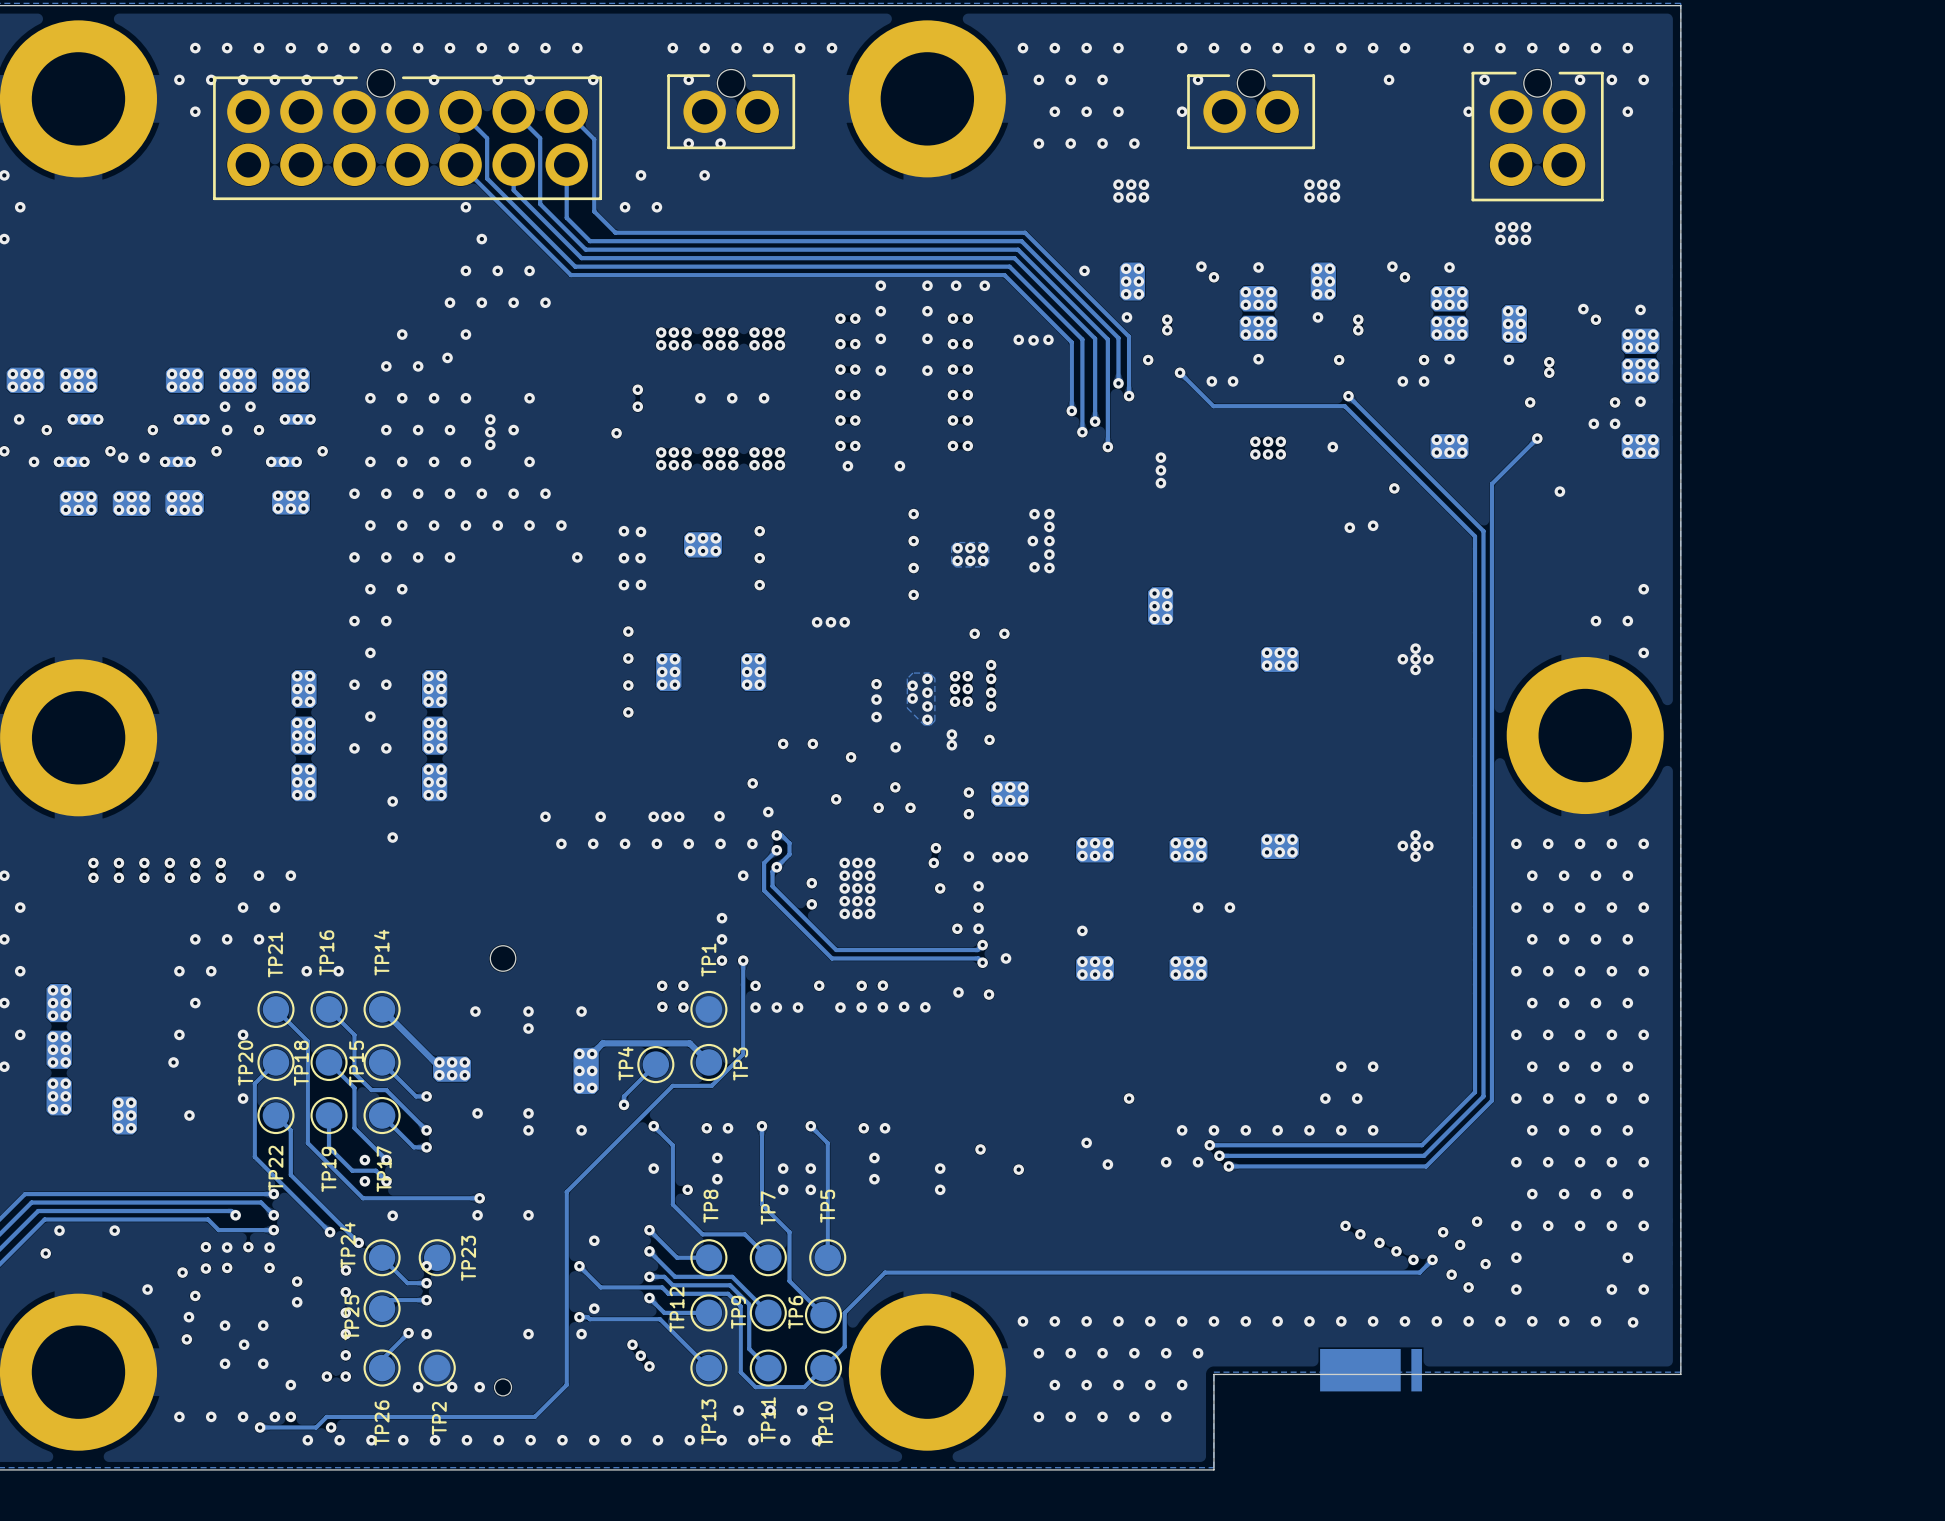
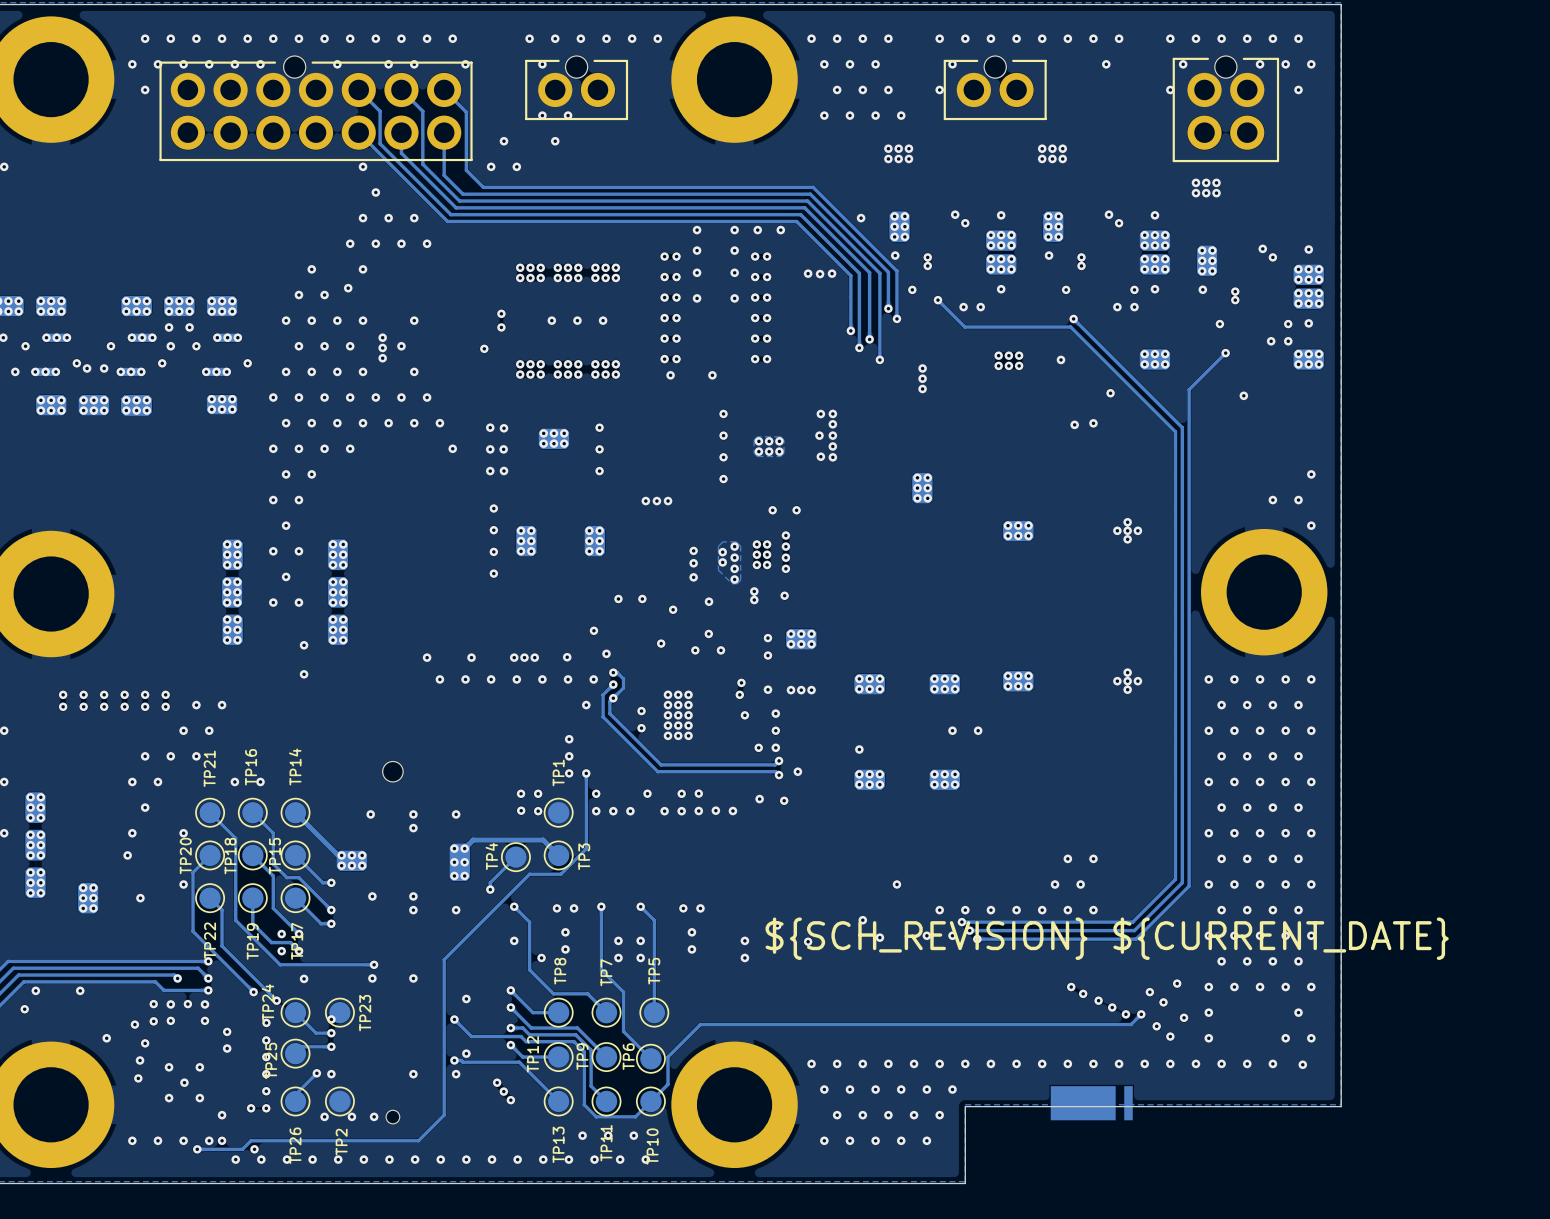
text: none -> ${SCH_REVISION} ${CURRENT_DATE} (1107, 938)

